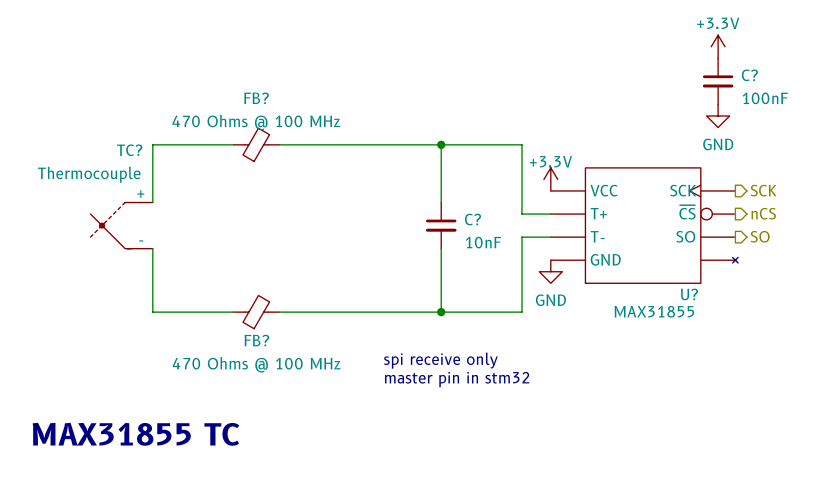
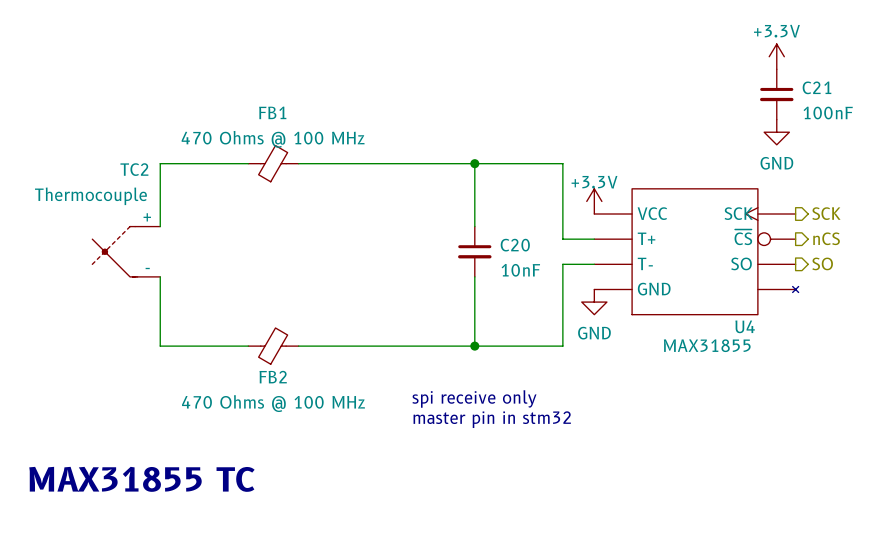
C? name: C? (749, 75) -> C21 (816, 87)
FB? name: FB? (256, 98) -> FB1 (272, 112)
TC? name: TC? (129, 150) -> TC2 (134, 169)
C? name: C? (472, 219) -> C20 (515, 245)
U? name: U? (689, 294) -> U4 (745, 326)
FB? name: FB? (256, 340) -> FB2 (273, 377)

